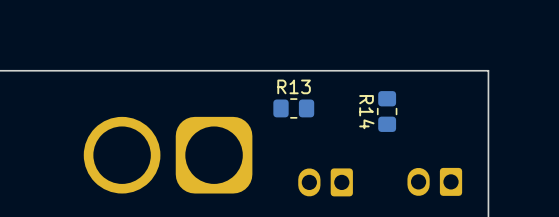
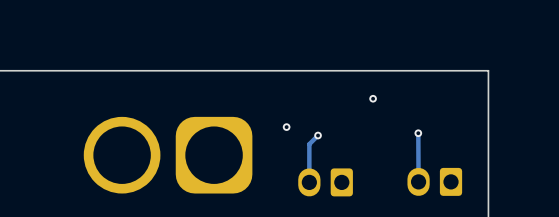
via: none -> (373, 98)
R13: (293, 108) -> none
R14: (387, 111) -> none
via: none -> (286, 127)
via: none -> (418, 133)
track: none -> (418, 134) (418, 181)
track: none -> (318, 135) (309, 144) (309, 182)
via: none -> (318, 135)

